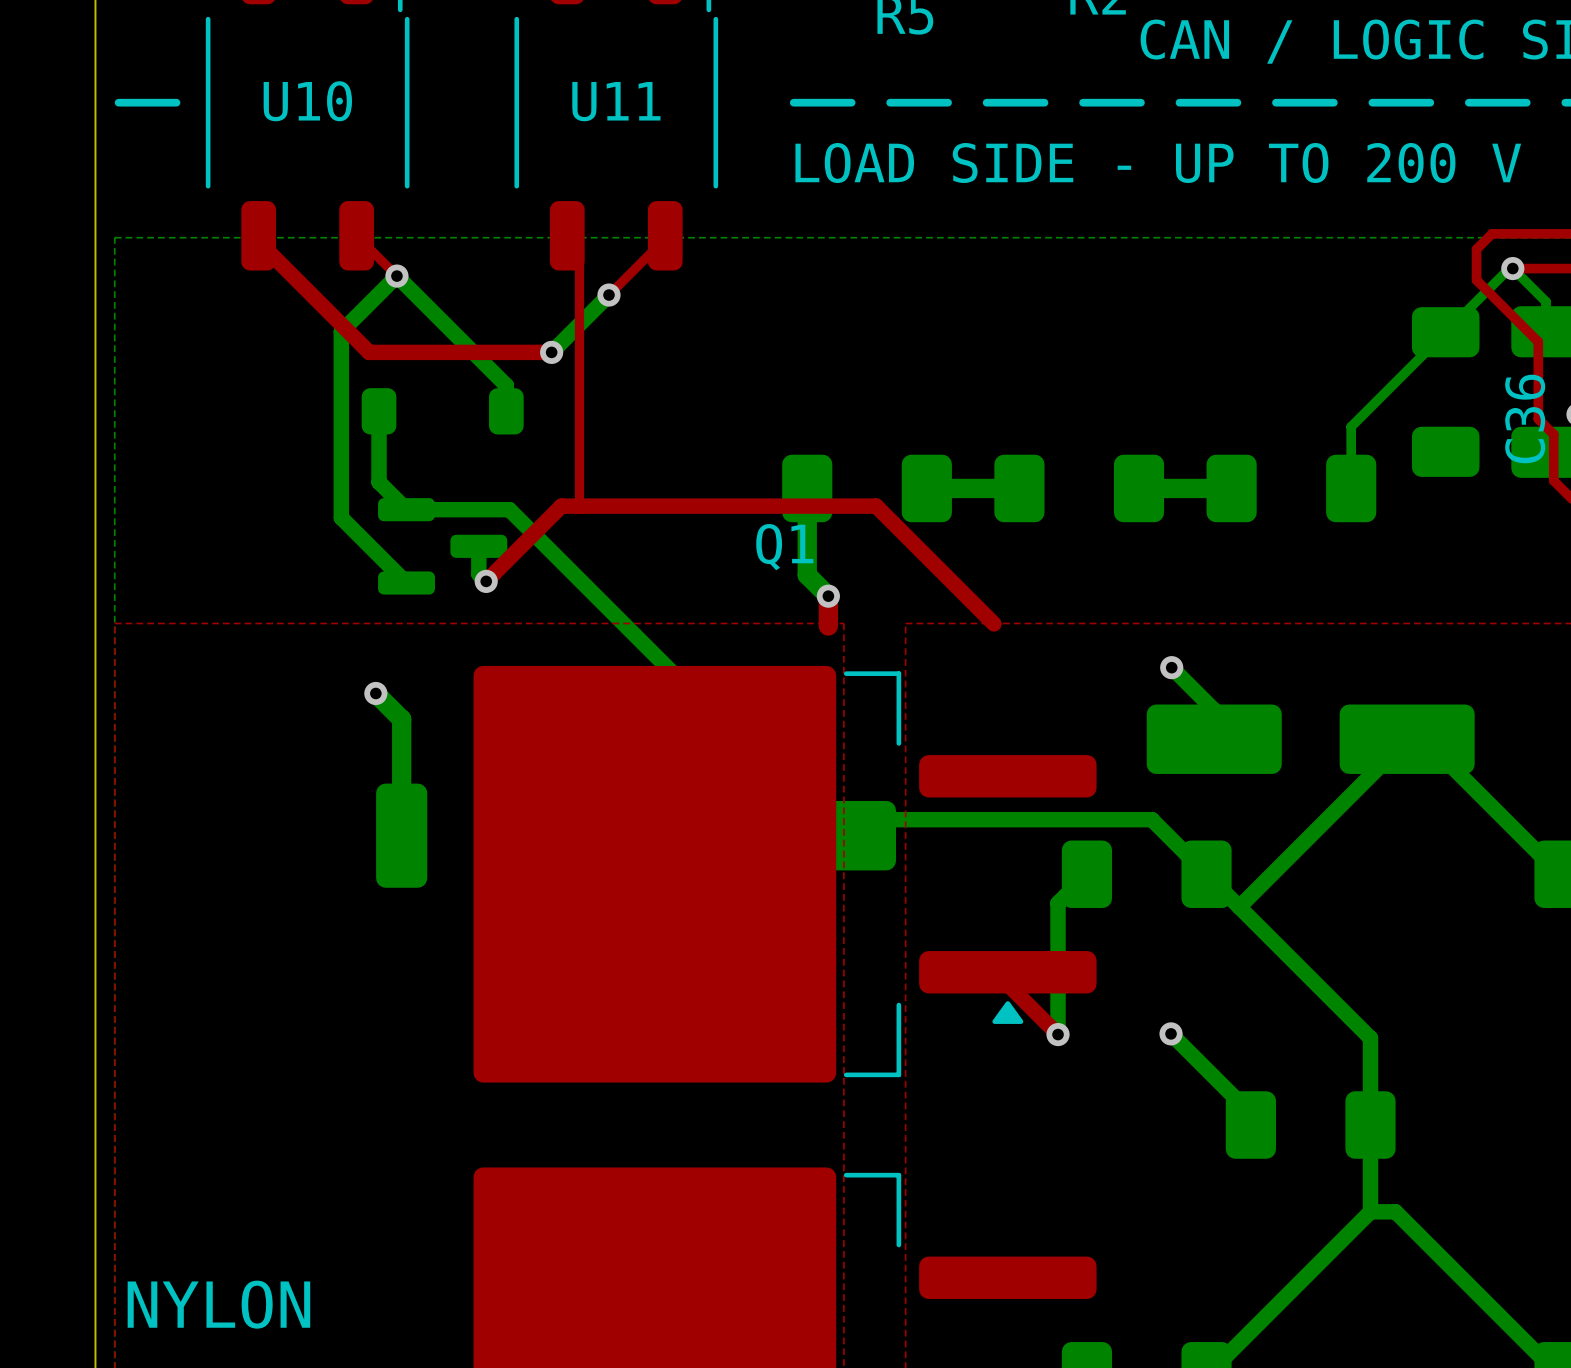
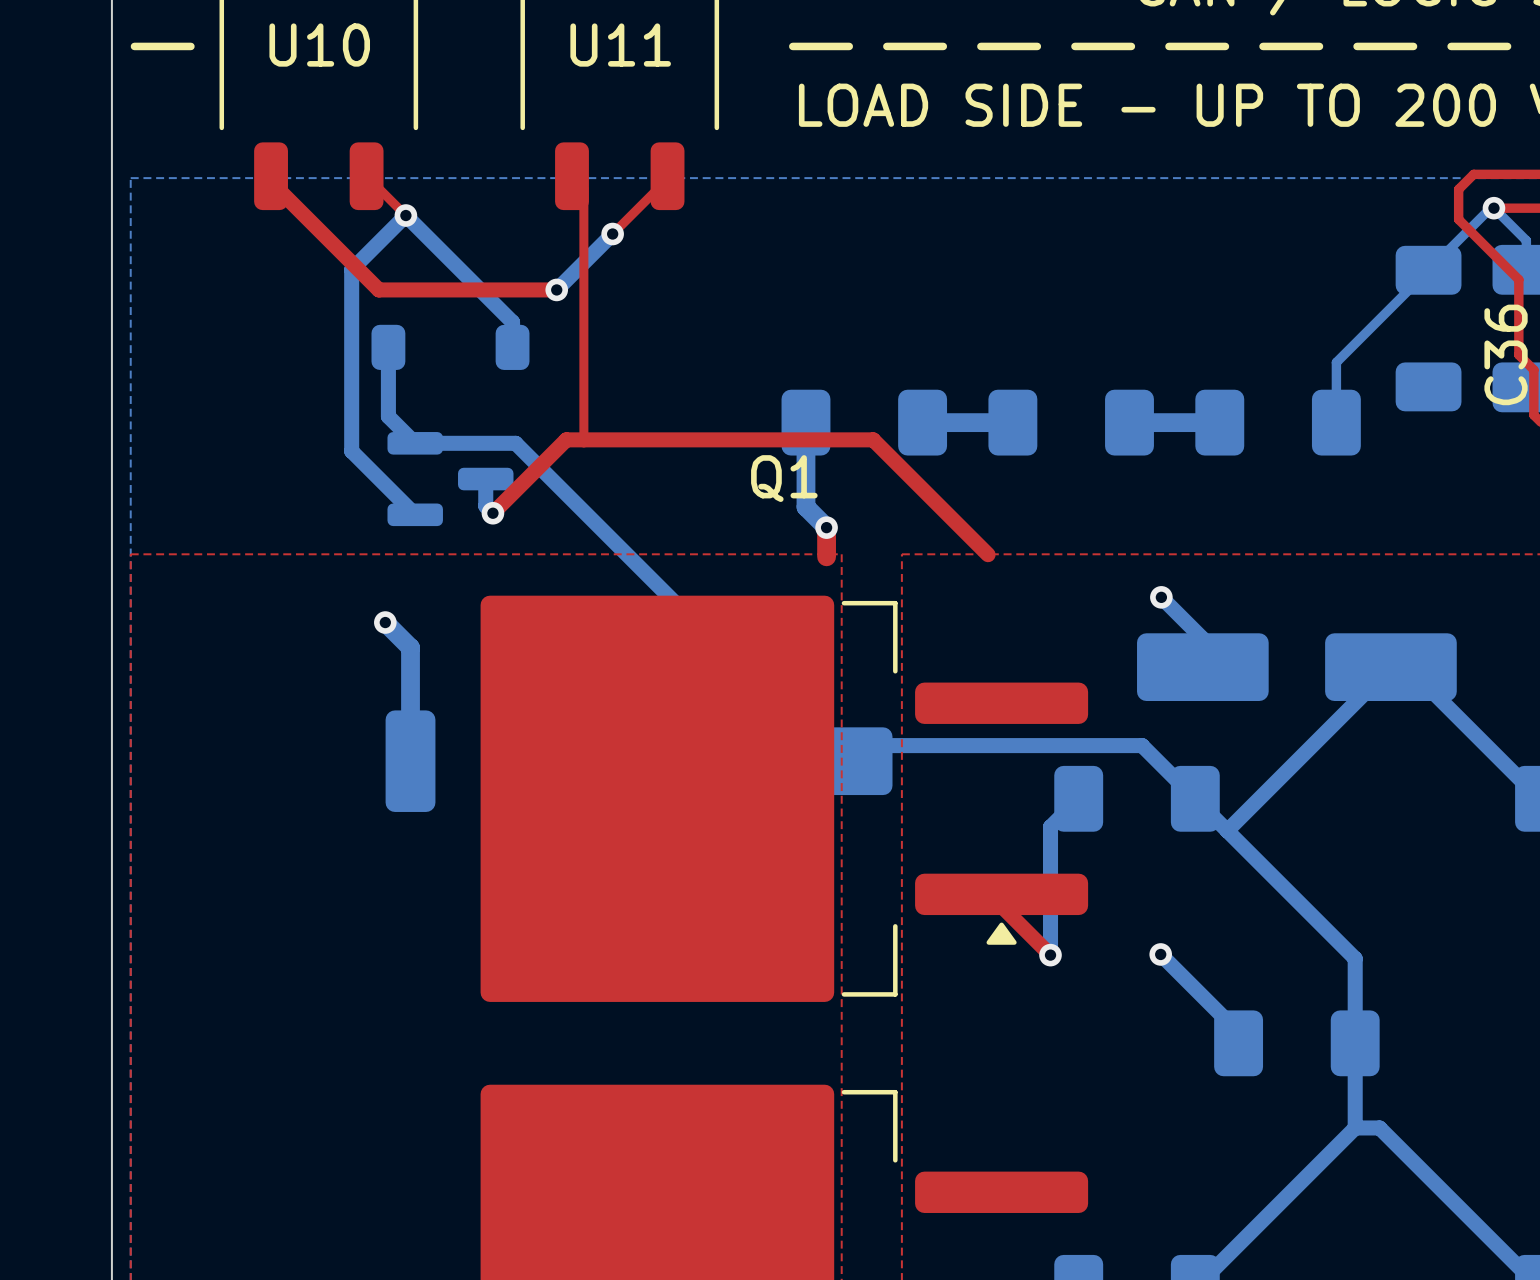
text: NYLON (218, 1304) -> none

